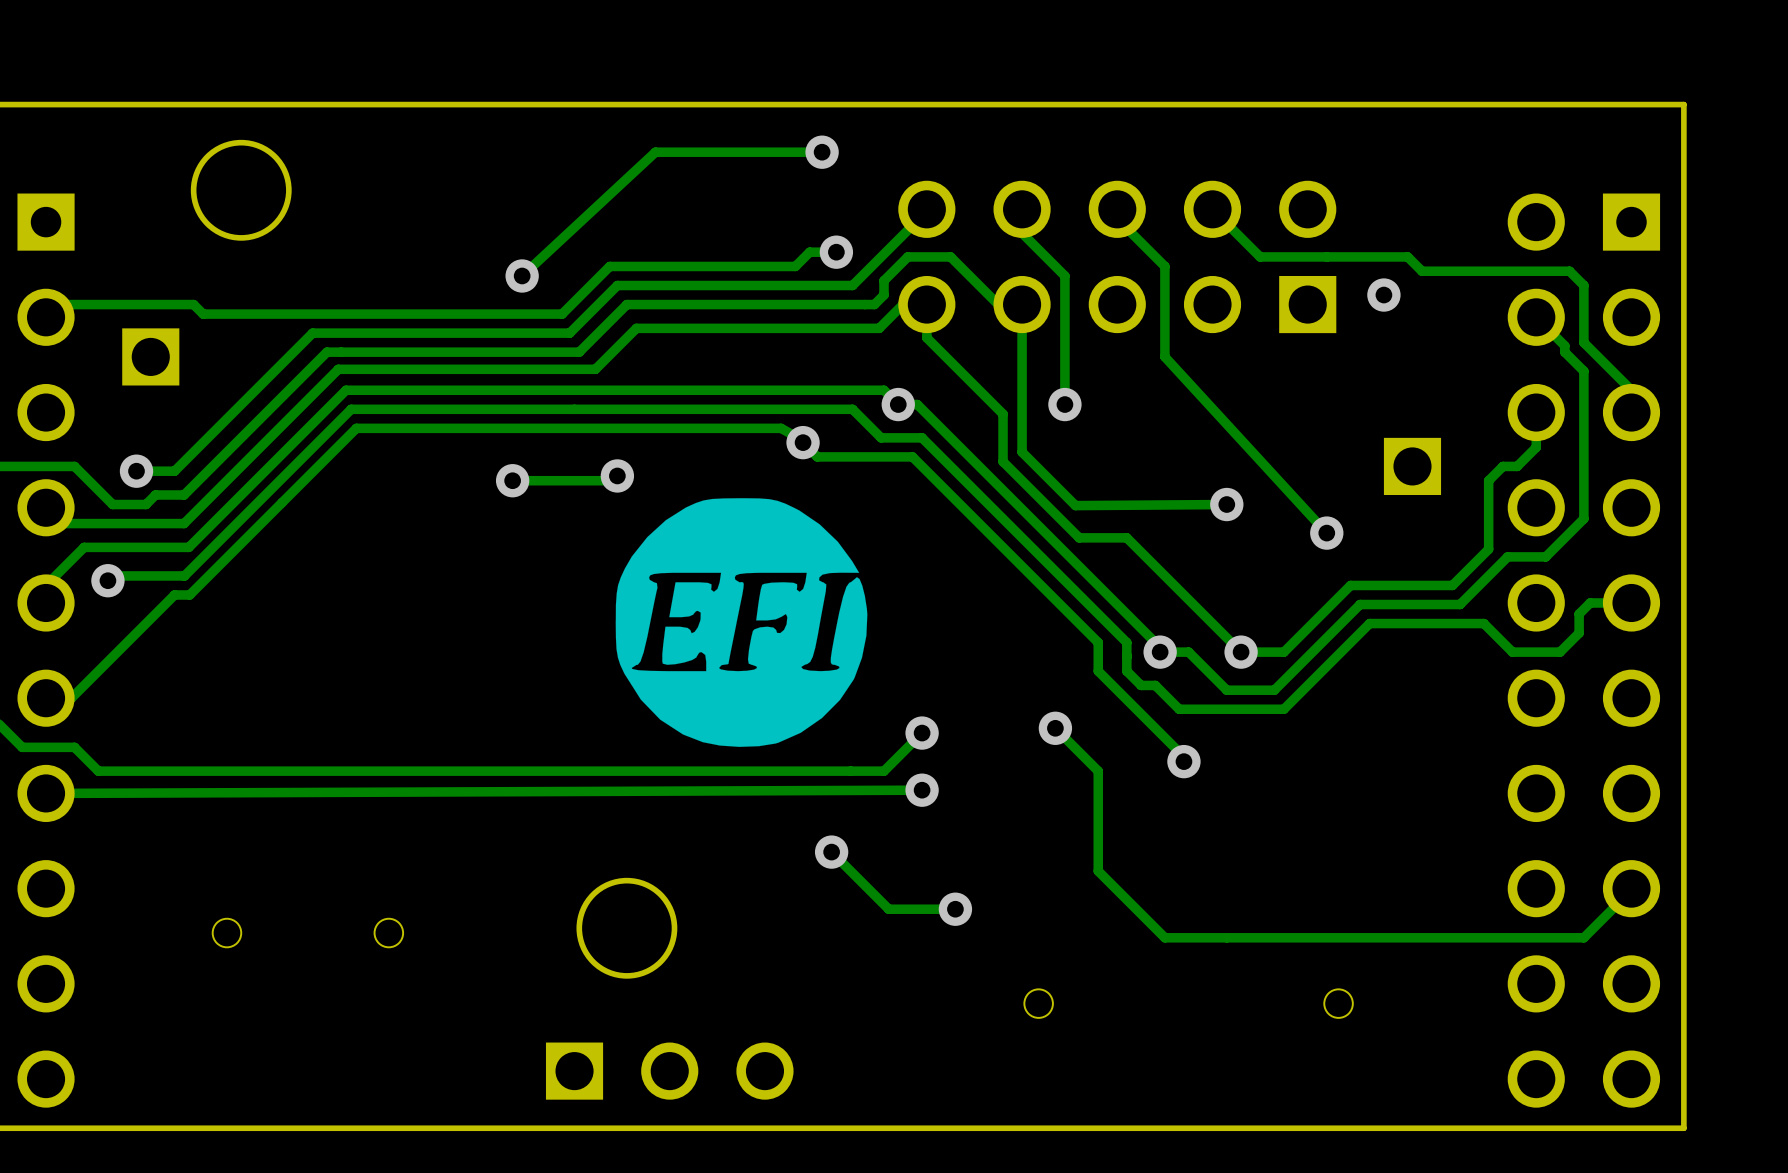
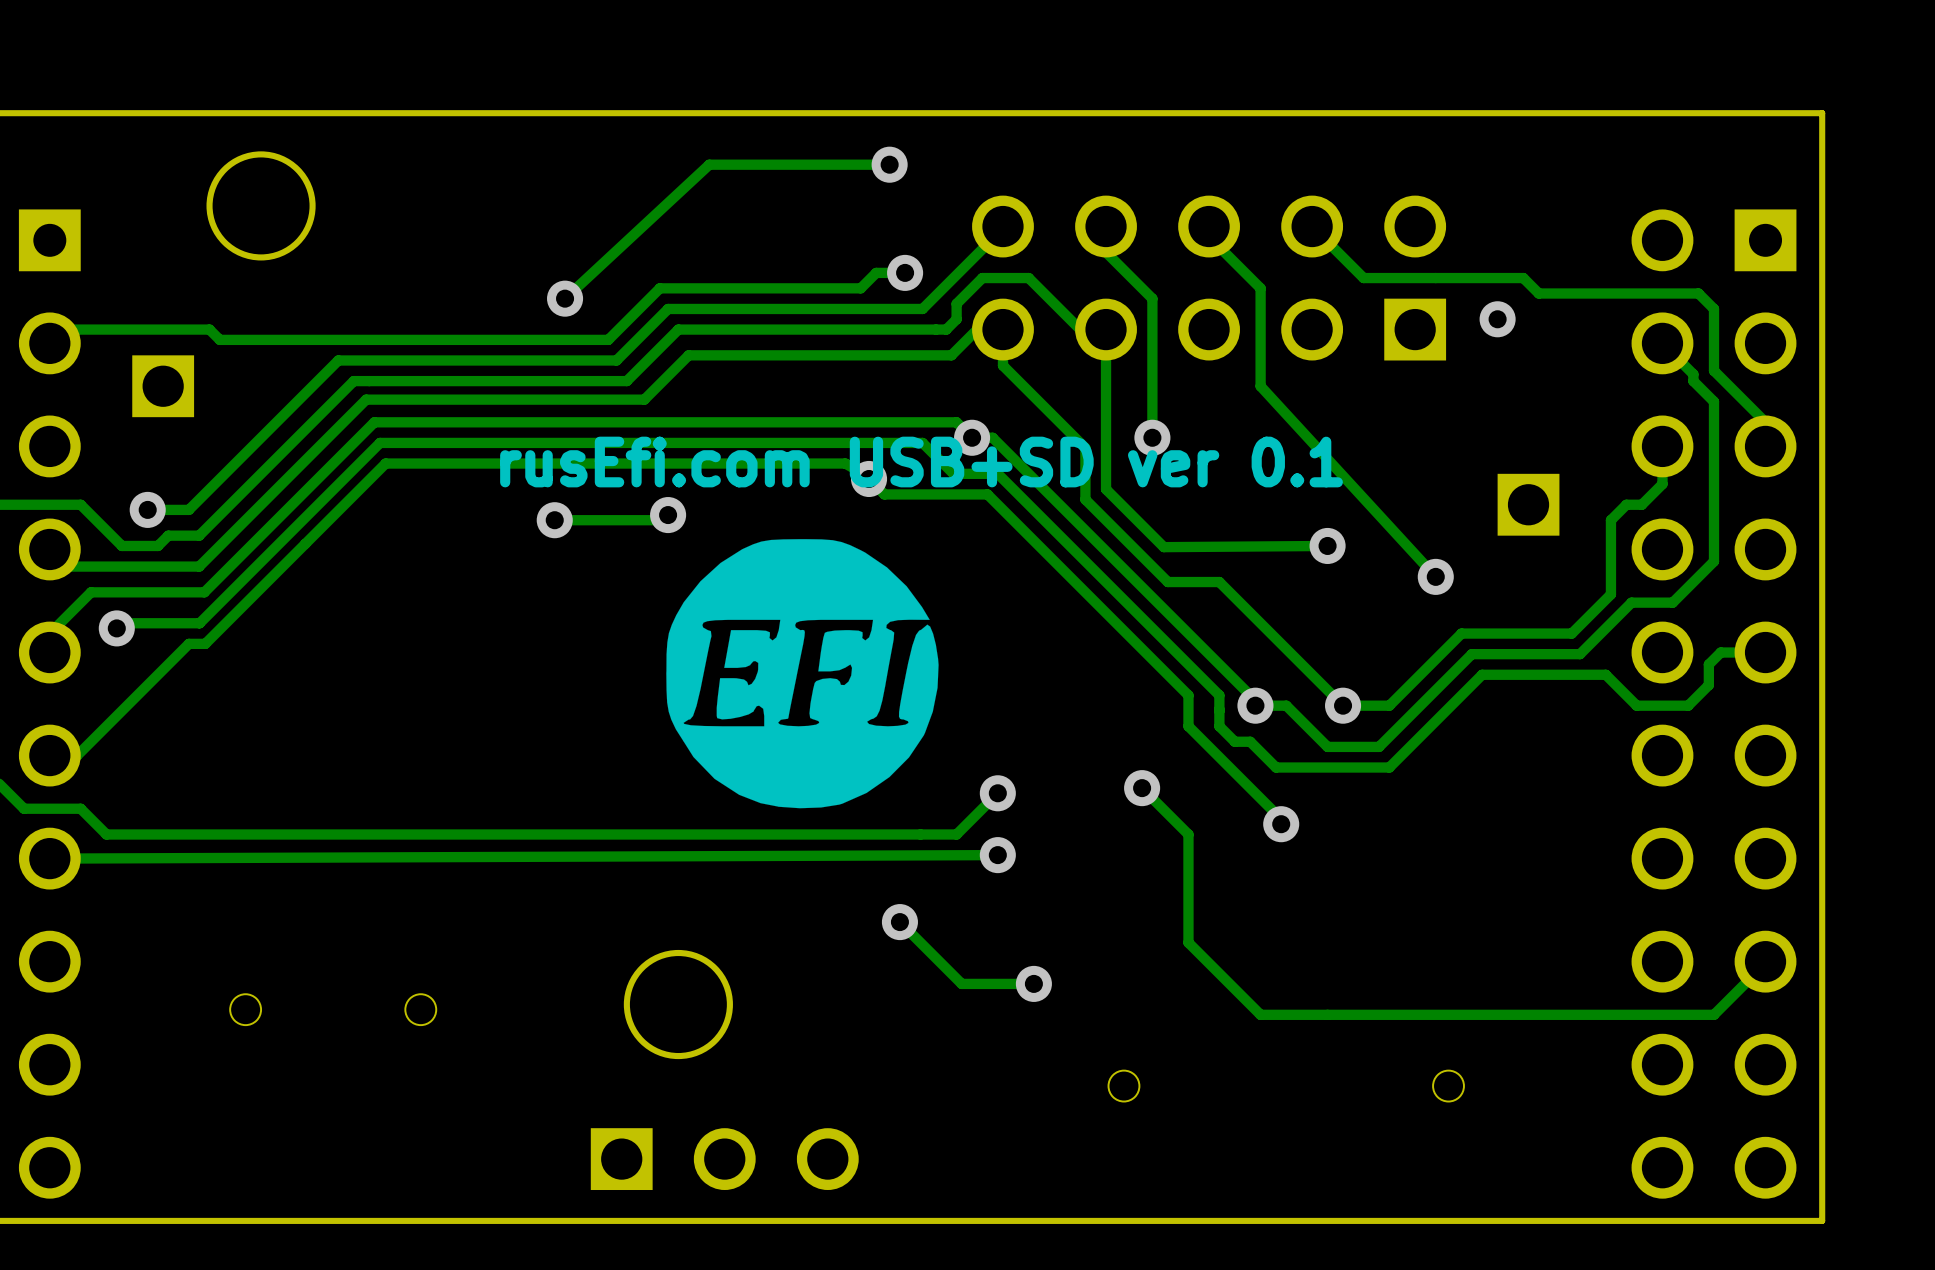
text: none -> rusEfi.com USB+SD ver 0.1 (921, 462)

